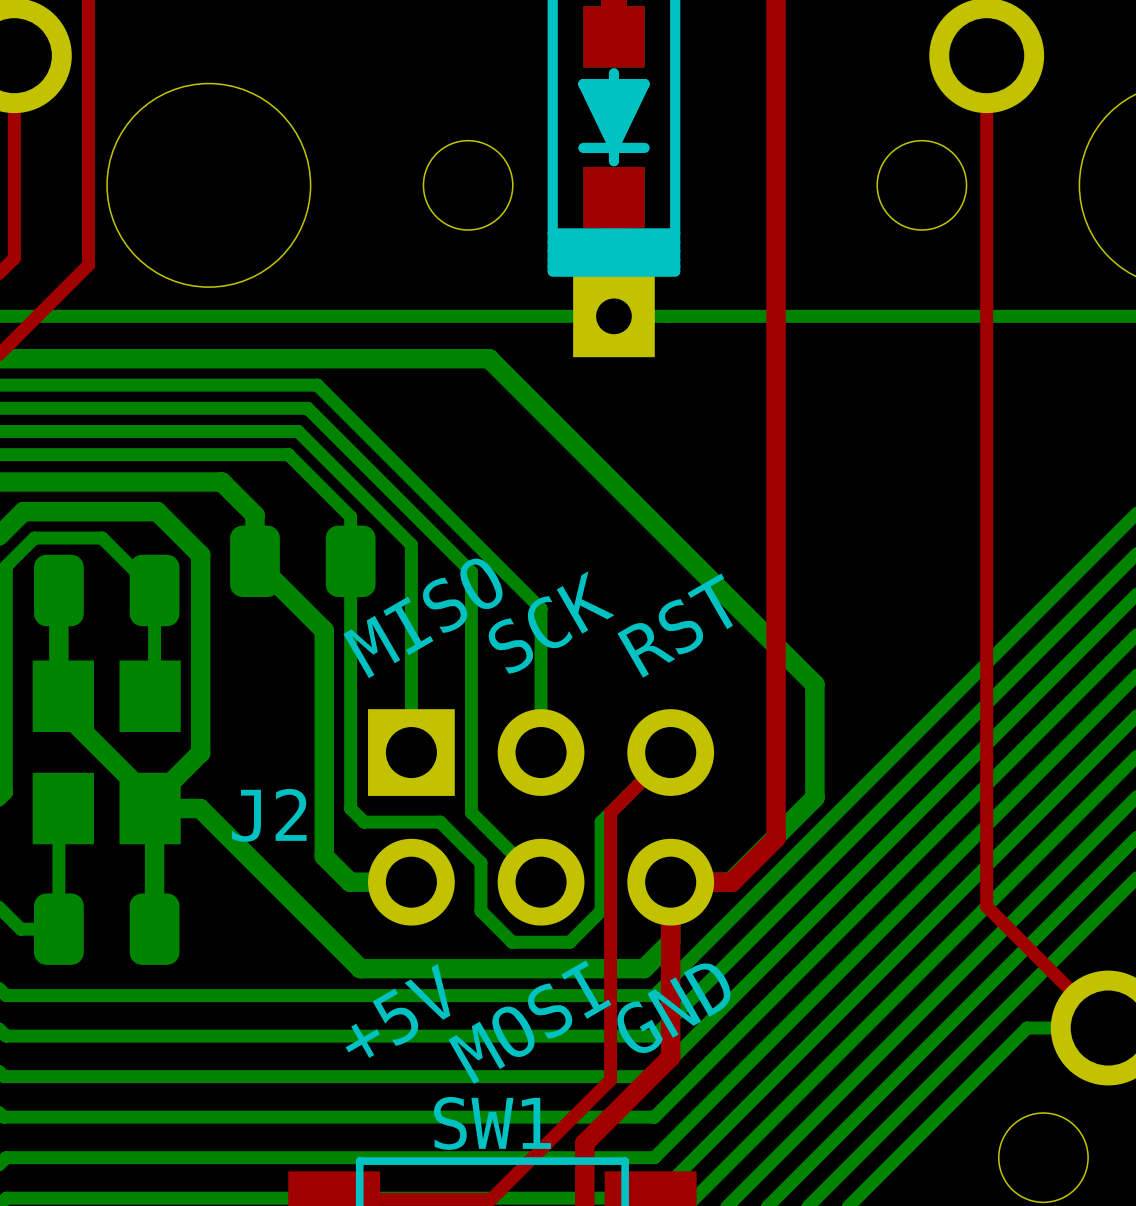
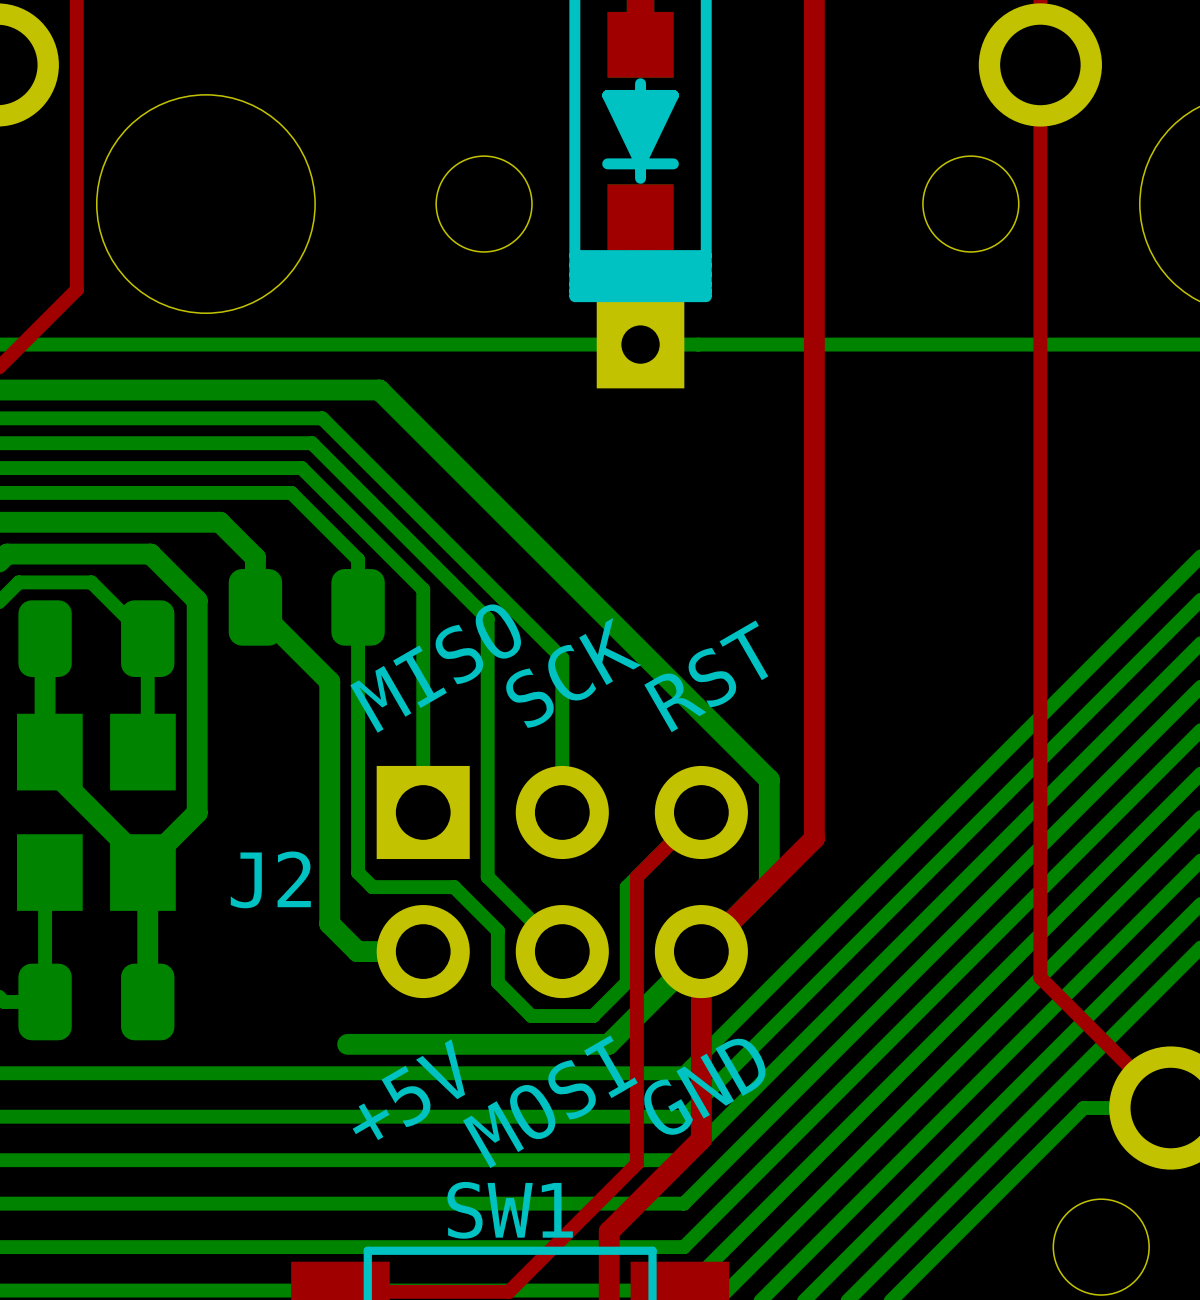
bottom track: (370, 358) (489, 358) (814, 684) (814, 797) (730, 882) (670, 882) (670, 942) (644, 968) (584, 968) -> (379, 390) (769, 779) (769, 883) (608, 1044)
top track: (776, 776) (776, 838) (732, 882) (670, 882) -> (814, 838) (701, 951)
bottom track: (150, 808) (200, 808) (360, 968) -> (347, 1044) (368, 1044)

